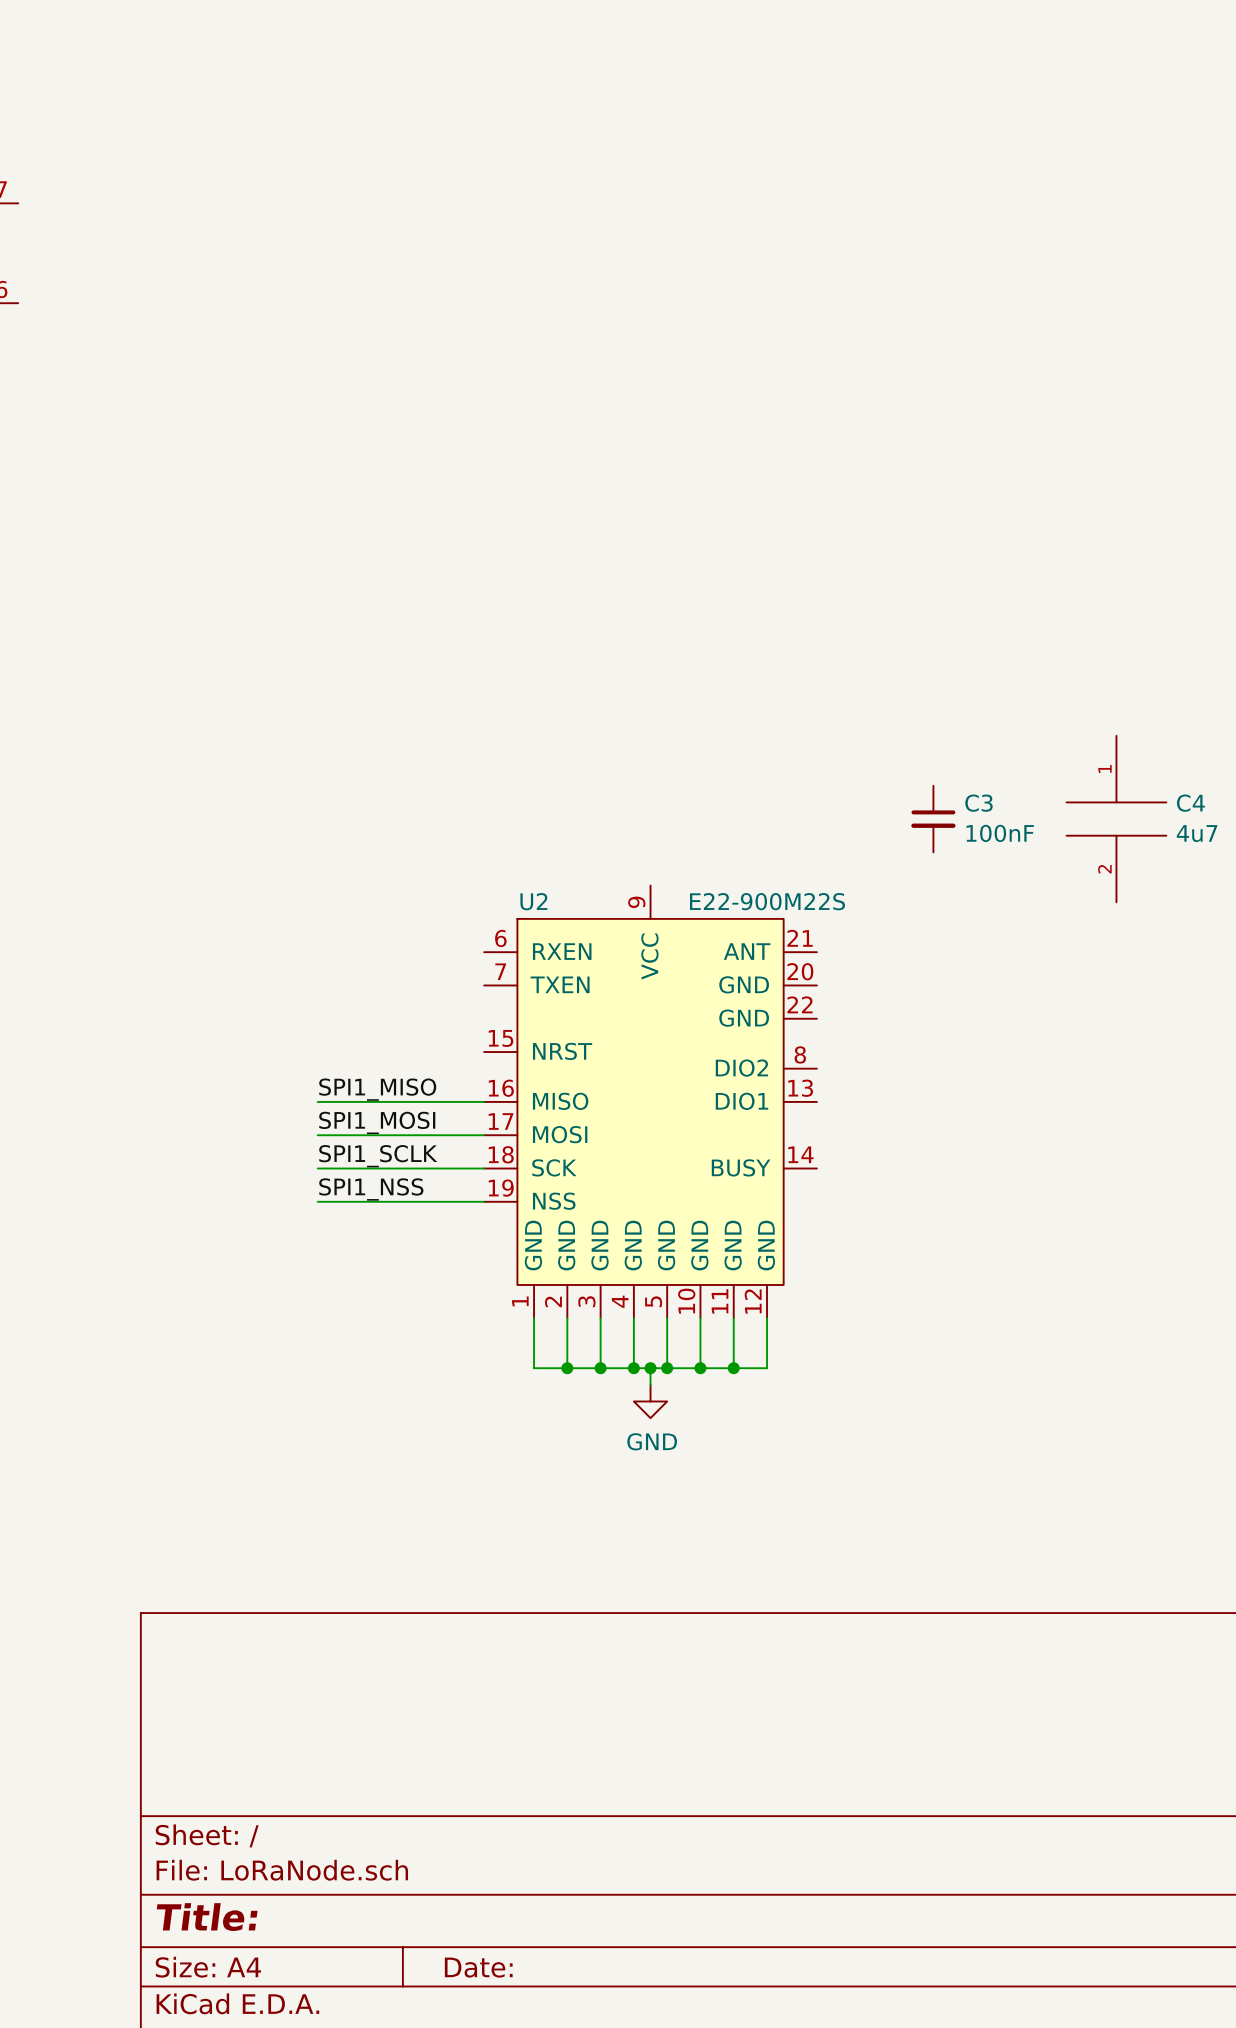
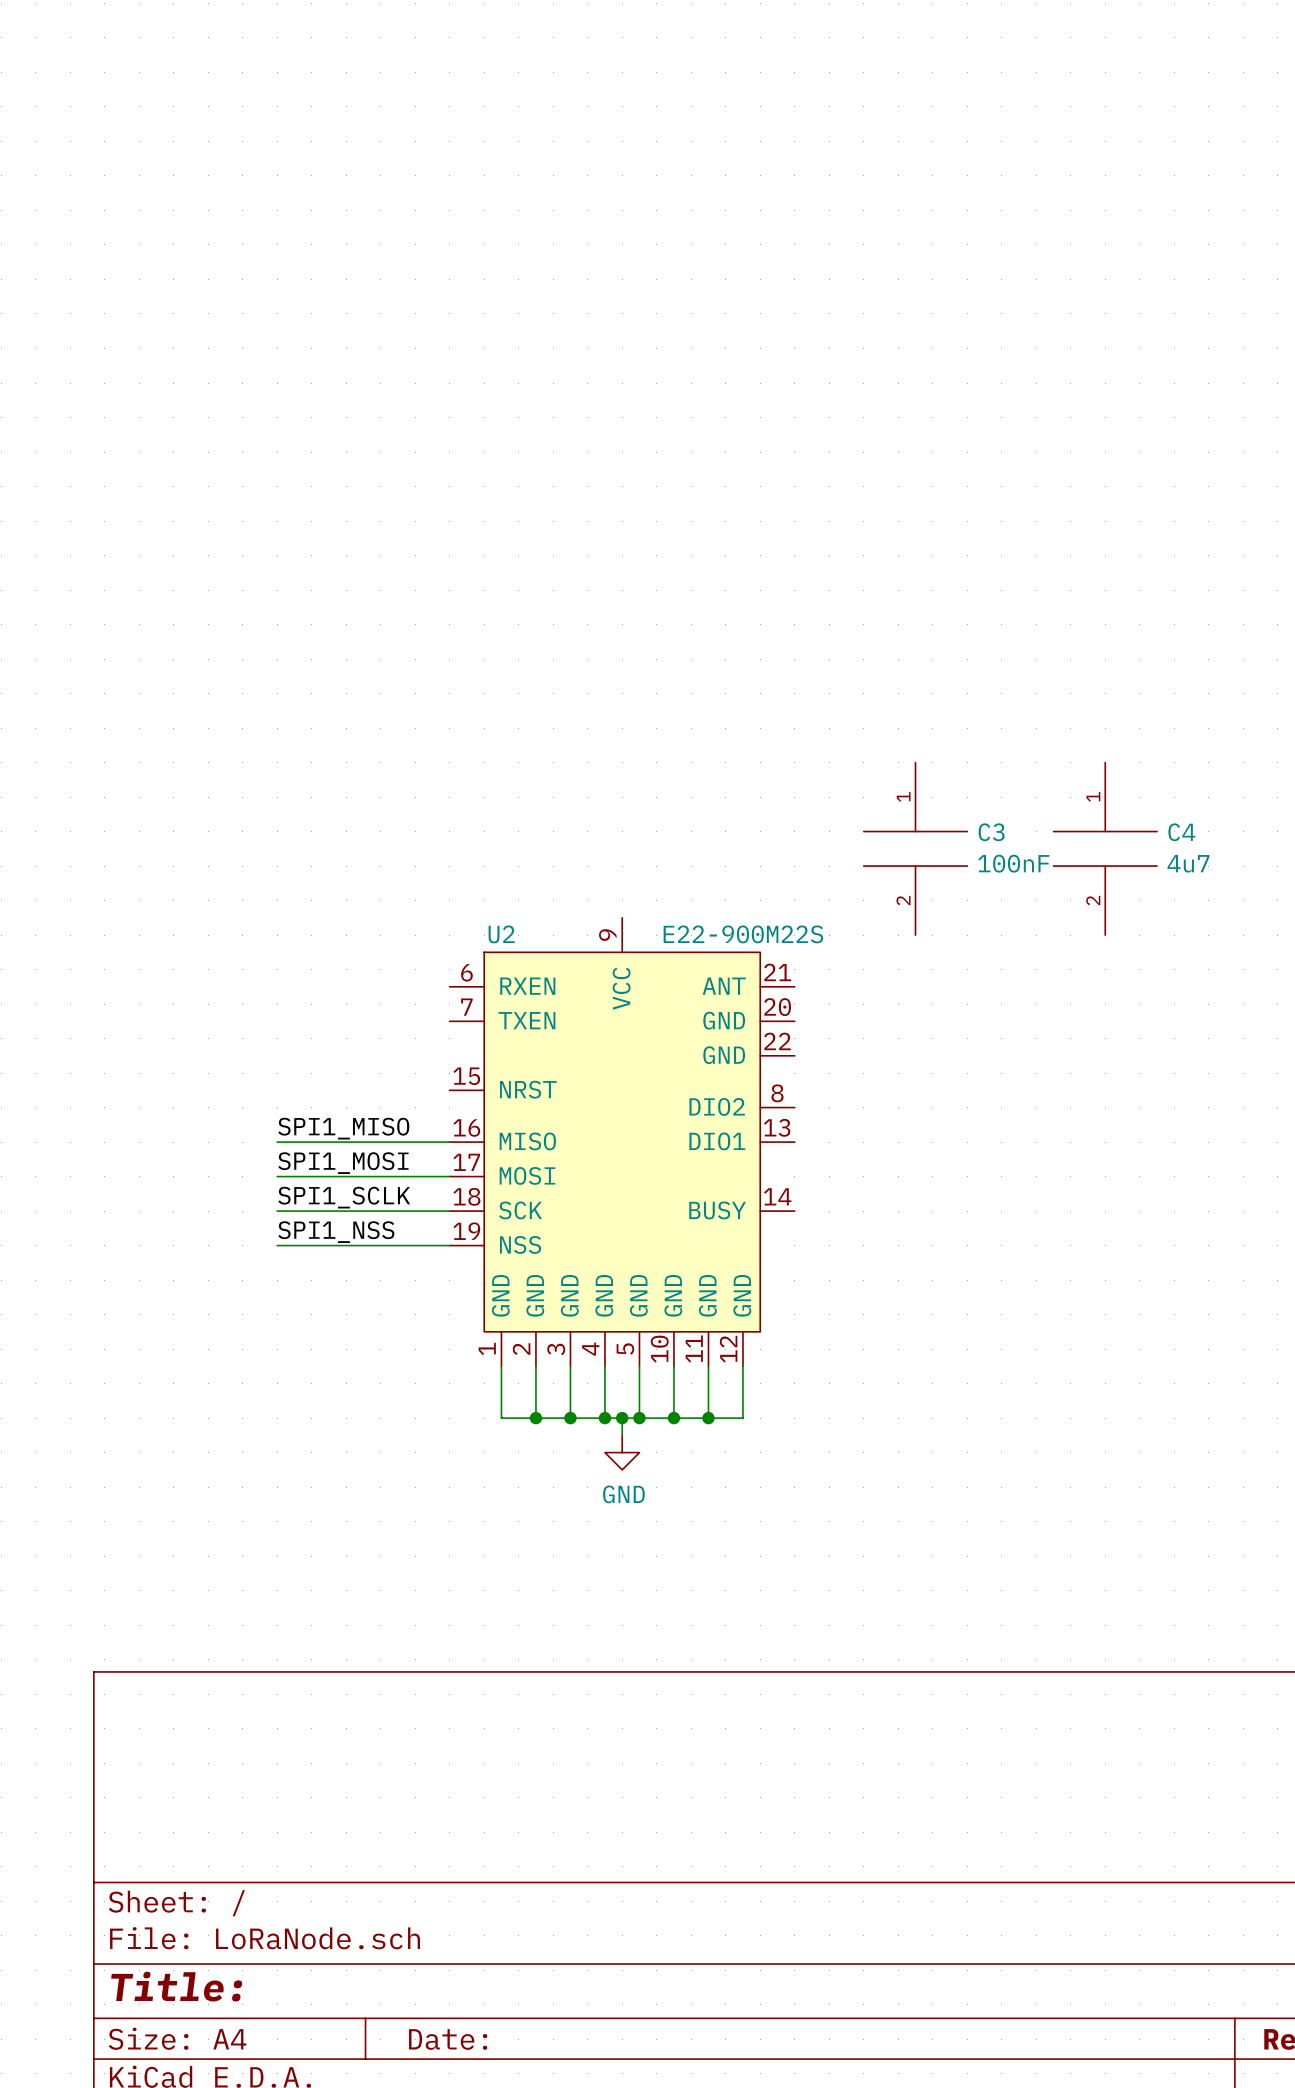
C3 symbol: [911, 785, 956, 853] -> [863, 762, 968, 936]
C3 name position: C3 (978, 803) -> C3 (991, 832)
C3 value position: 100nF (1000, 833) -> 100nF (1013, 863)

